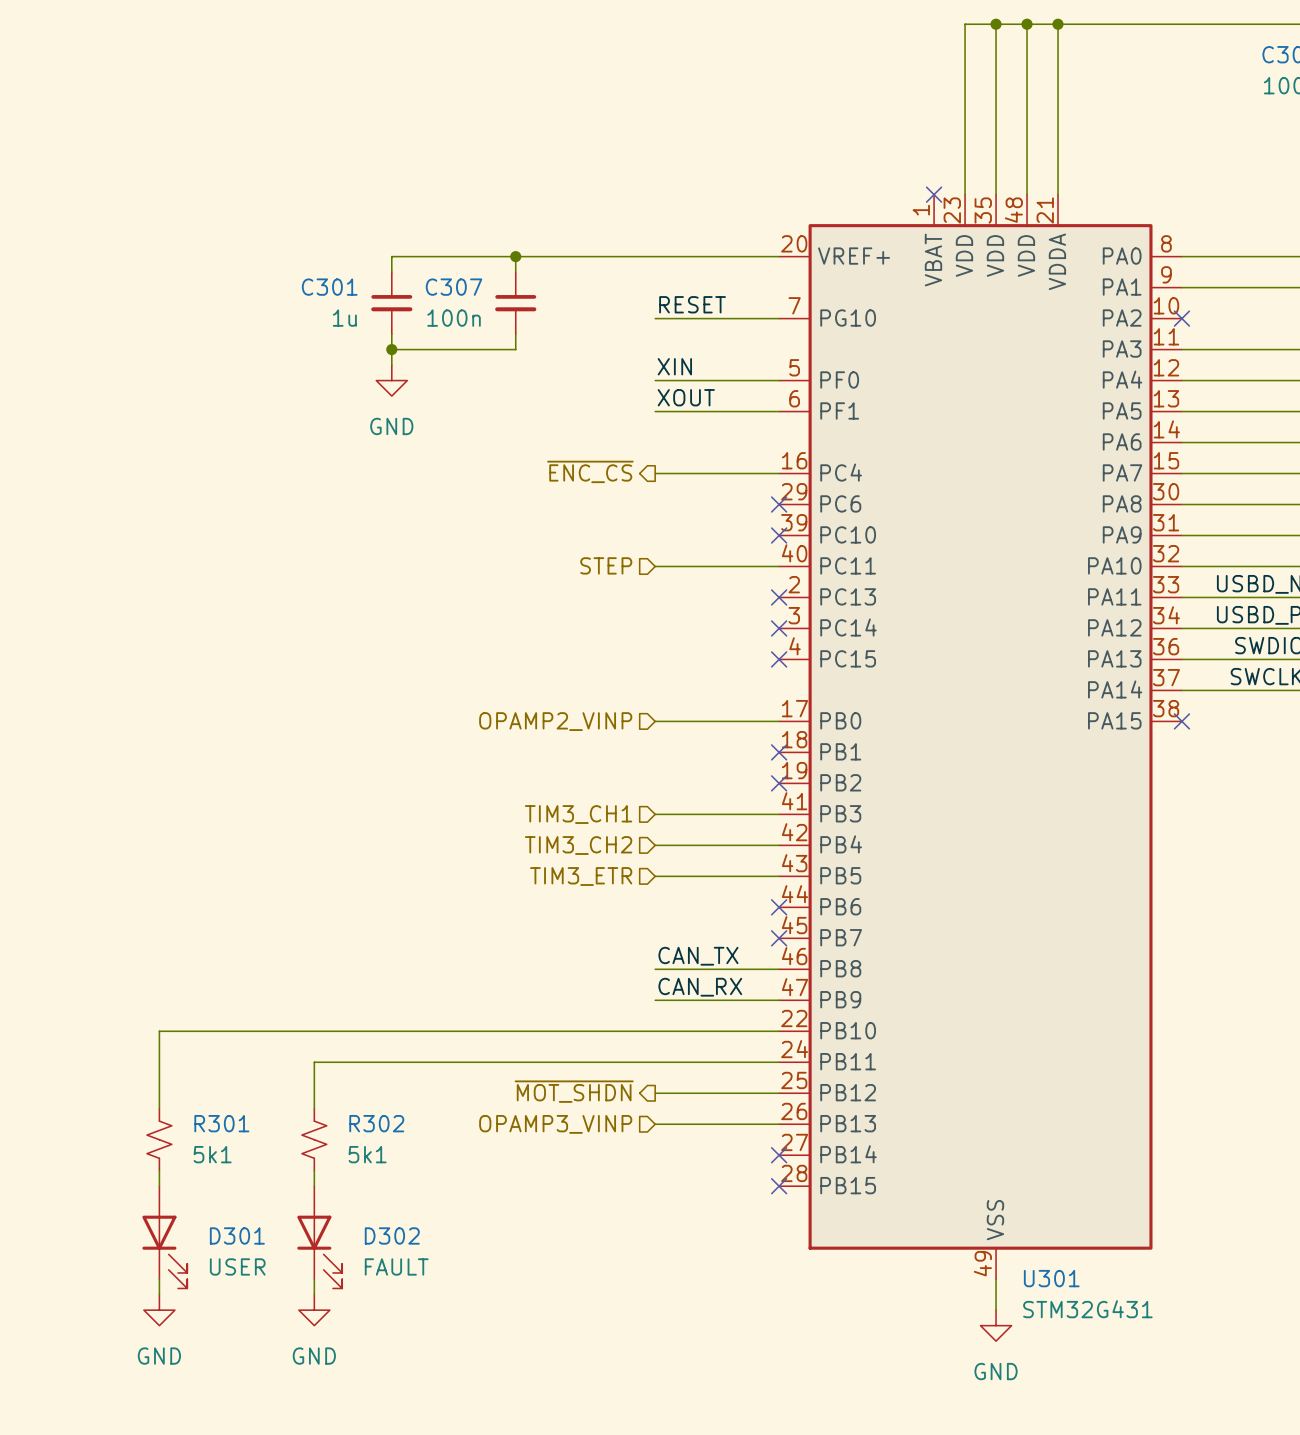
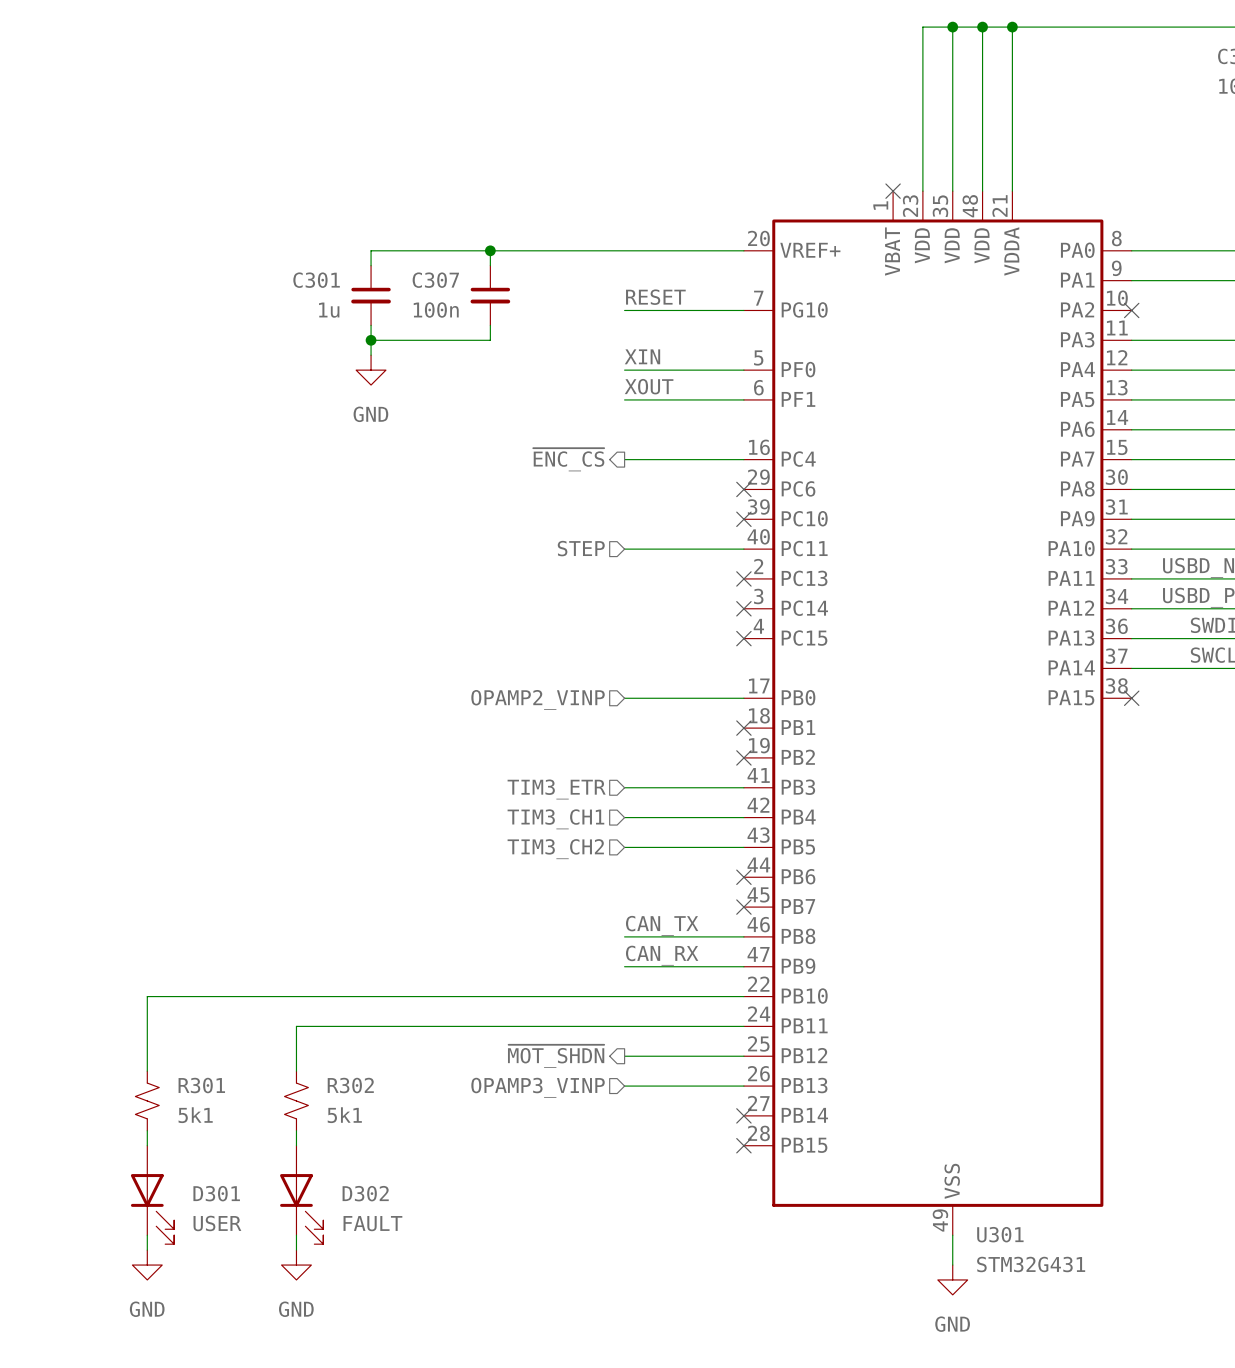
hierarchical label: TIM3_CH1 (578, 814) -> TIM3_ETR (556, 789)
hierarchical label: TIM3_CH2 (578, 845) -> TIM3_CH1 (555, 819)
hierarchical label: TIM3_ETR (581, 876) -> TIM3_CH2 (555, 849)

